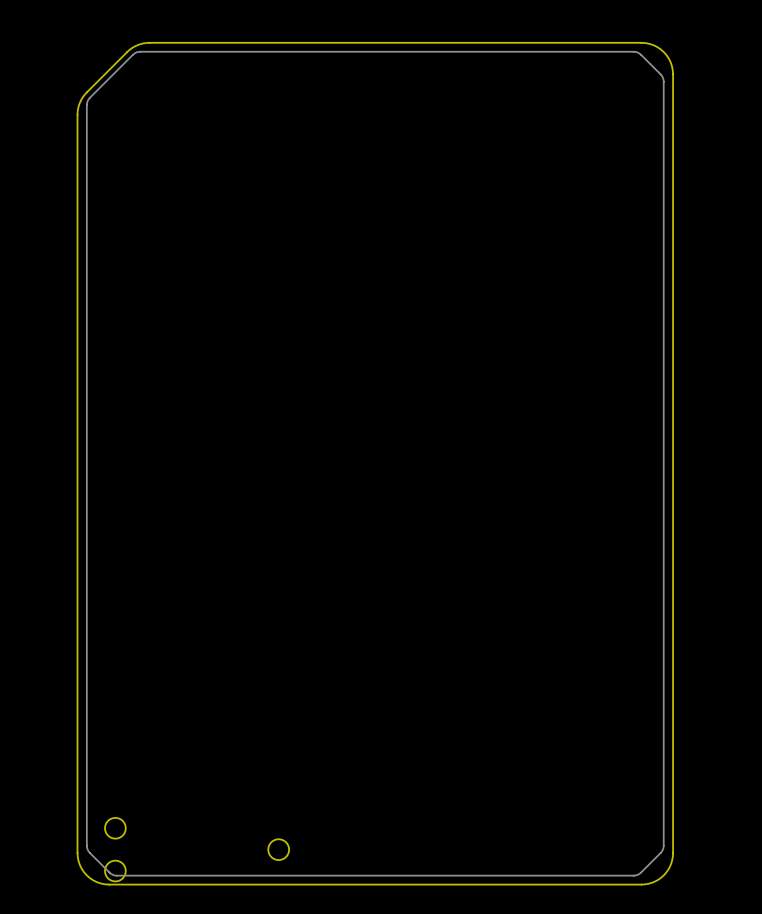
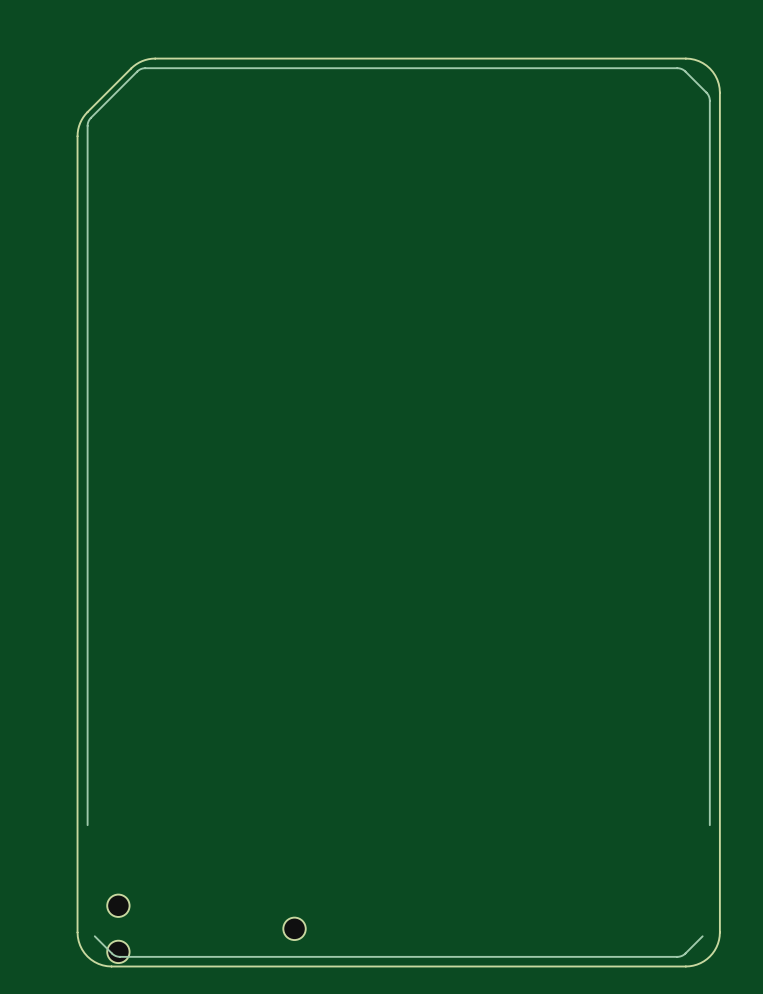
line: (86, 753) (86, 845) (88, 850) (93, 856) -> none
line: (663, 753) (663, 845) (662, 850) (657, 856) -> none

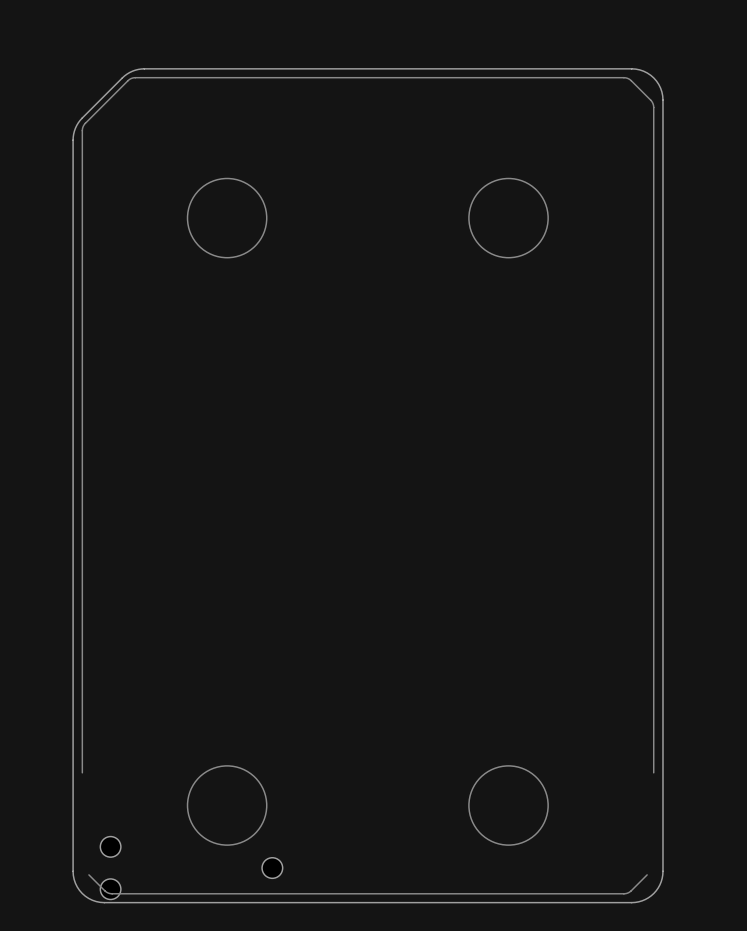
drawing: none -> [187, 178, 267, 258]
drawing: none -> [468, 178, 549, 258]
drawing: none -> [187, 765, 267, 846]
drawing: none -> [468, 765, 549, 846]

